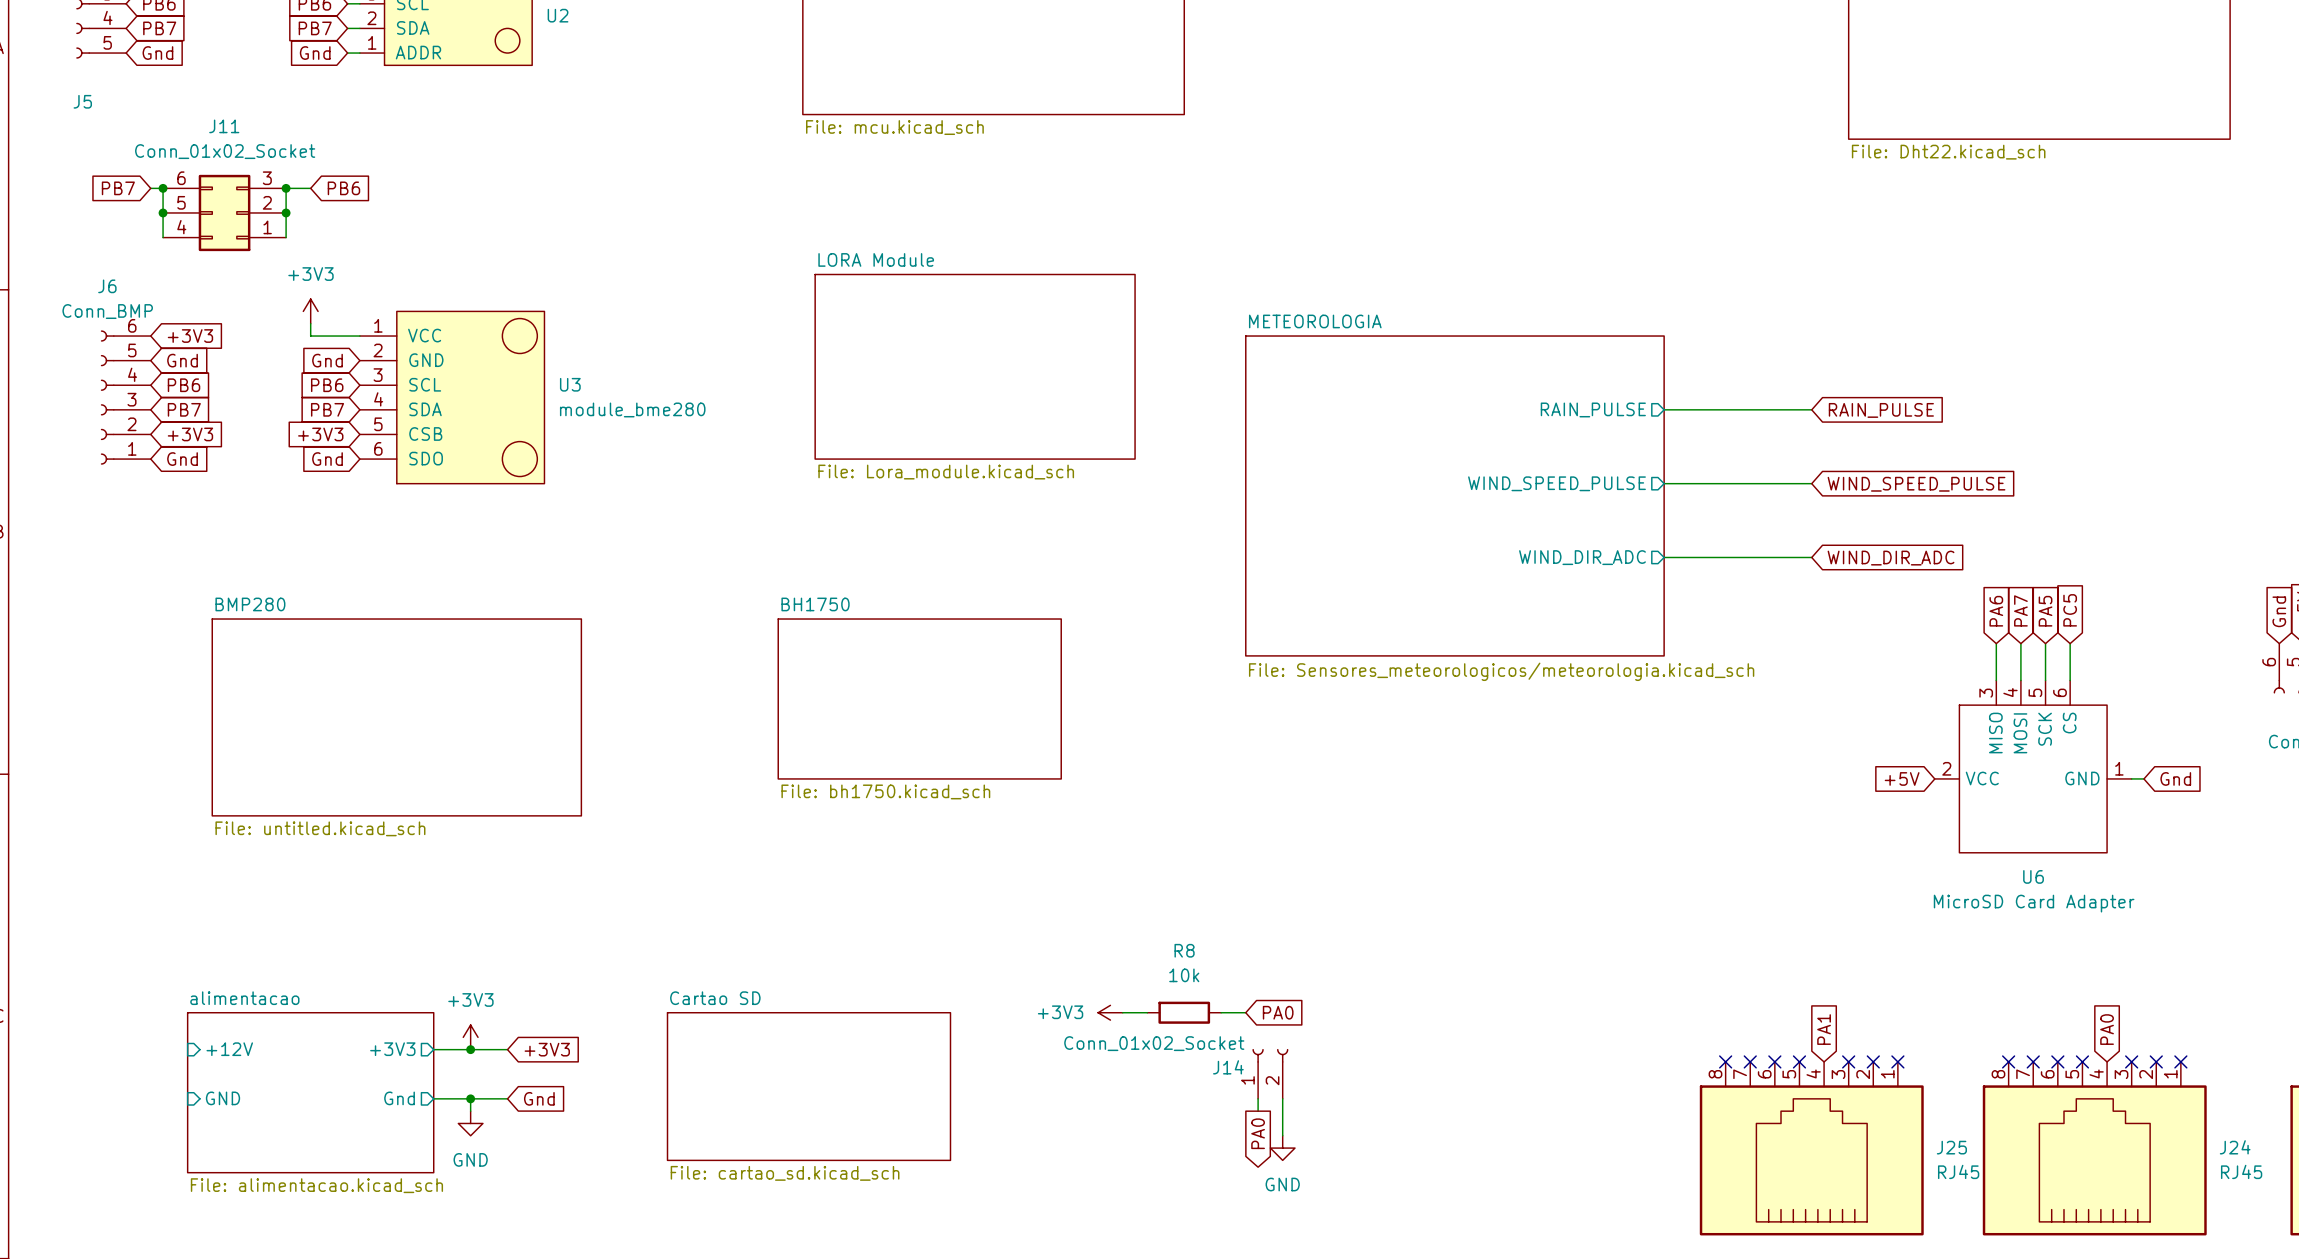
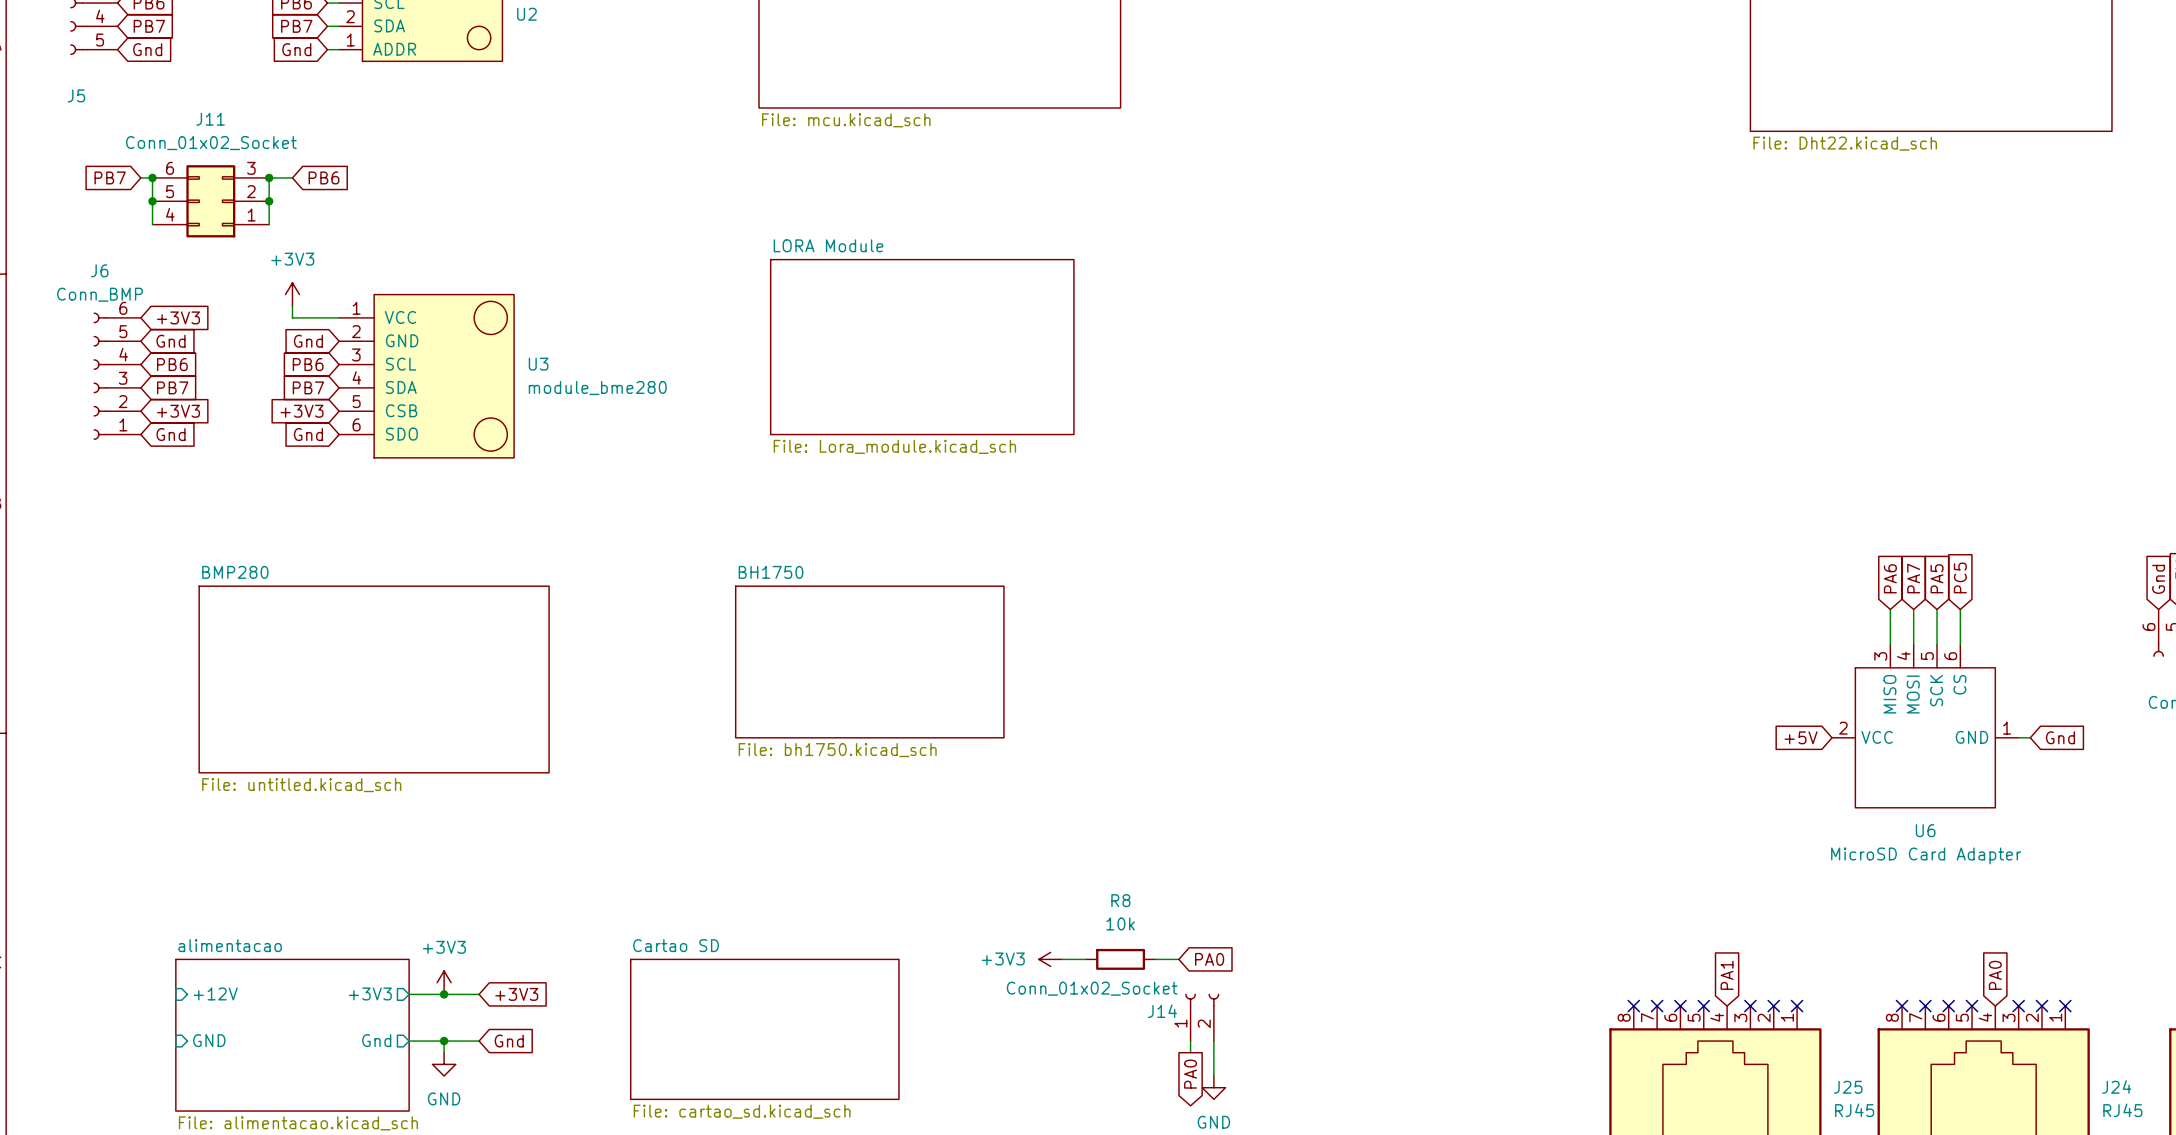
sheet pin: RAIN_PULSE (1593, 409) -> none
wire: (1664, 409) (1811, 409) -> none
global label: RAIN_PULSE (1881, 410) -> none
sheet pin: WIND_SPEED_PULSE (1557, 483) -> none
wire: (1664, 483) (1811, 483) -> none
global label: WIND_SPEED_PULSE (1916, 484) -> none
sheet METEOROLOGIA: File: Sensores_meteorologicos/meteorologia.kicad_sch (1454, 495) -> none
sheet pin: WIND_DIR_ADC (1582, 557) -> none
wire: (1664, 557) (1811, 557) -> none
global label: WIND_DIR_ADC (1891, 558) -> none

